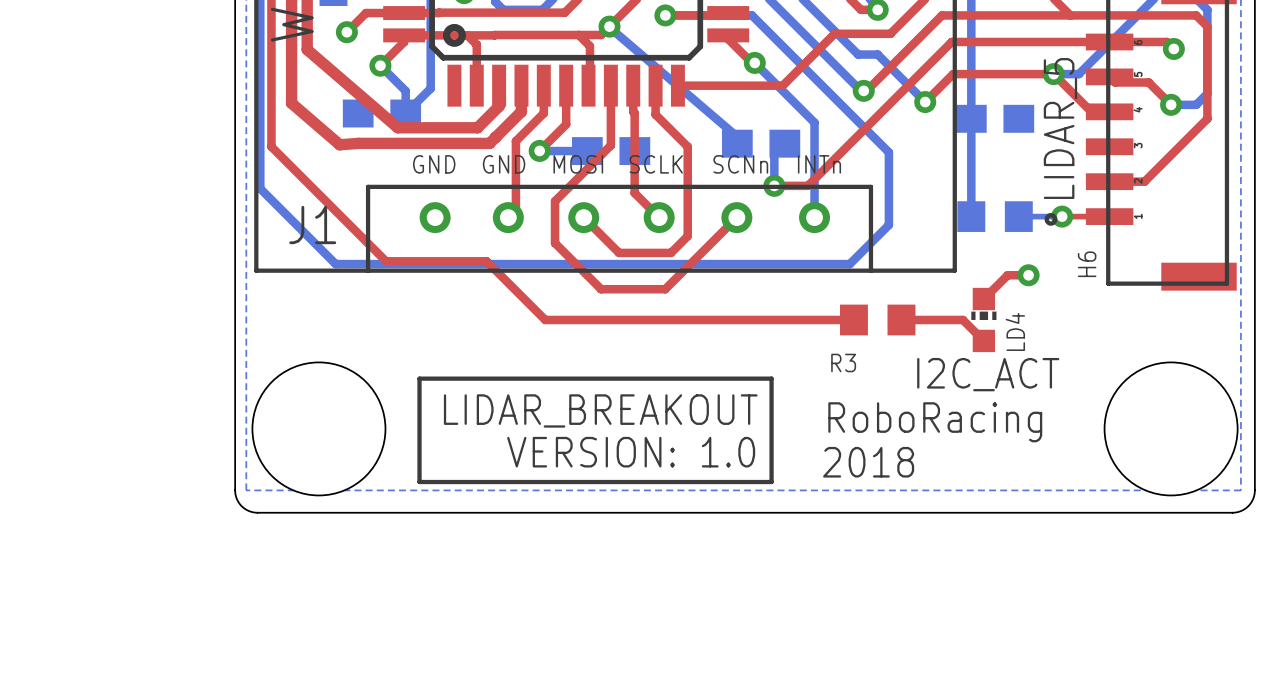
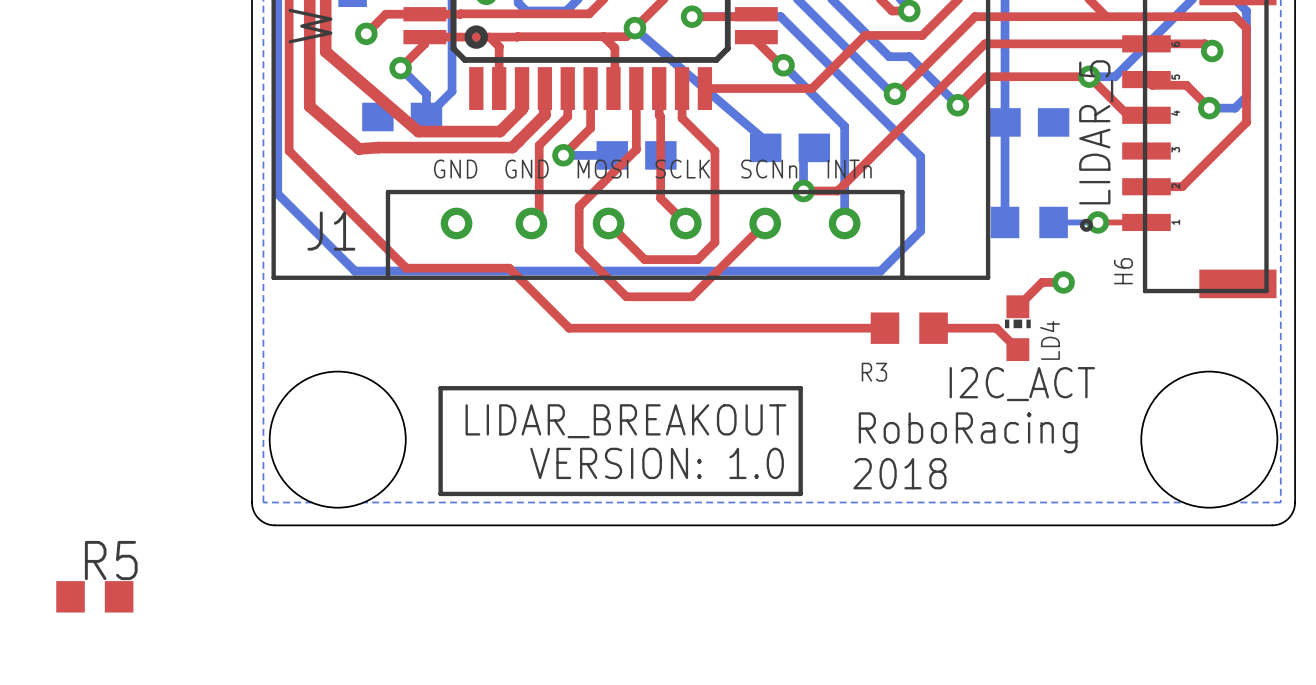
R5: none -> (94, 596)

